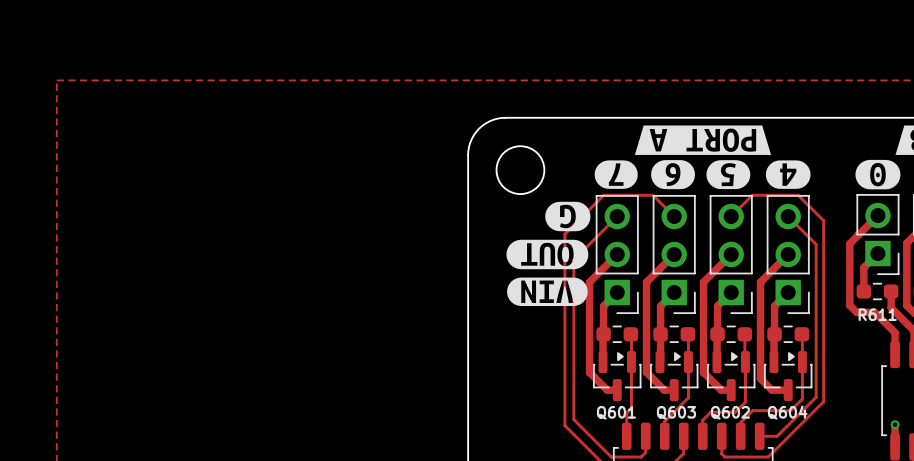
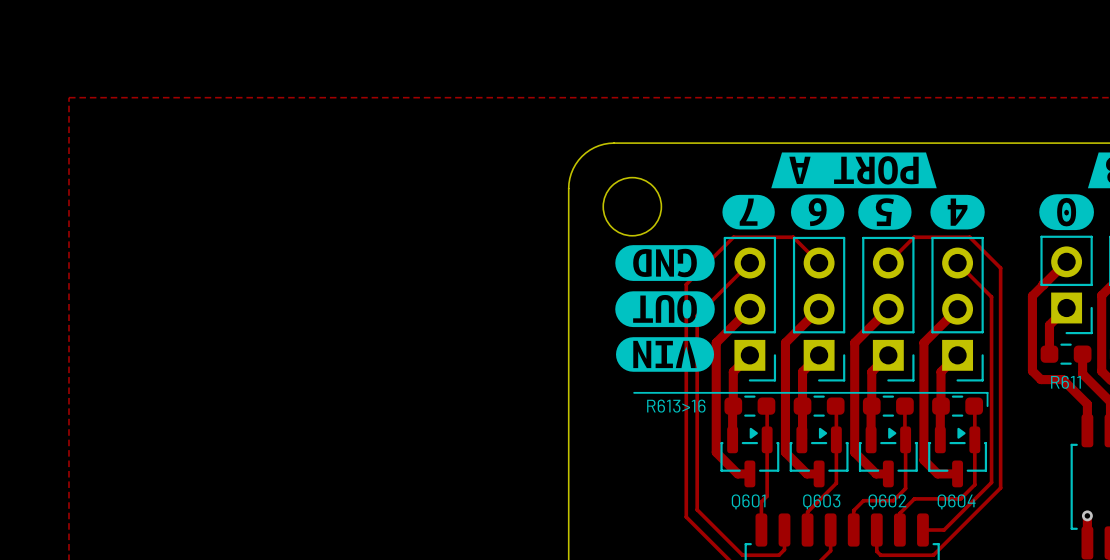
drawing: none -> [615, 245, 715, 281]
drawing: [545, 201, 591, 232] -> none
line: none -> (634, 392) (987, 392) (987, 406)
text: none -> R613>16 (676, 406)

